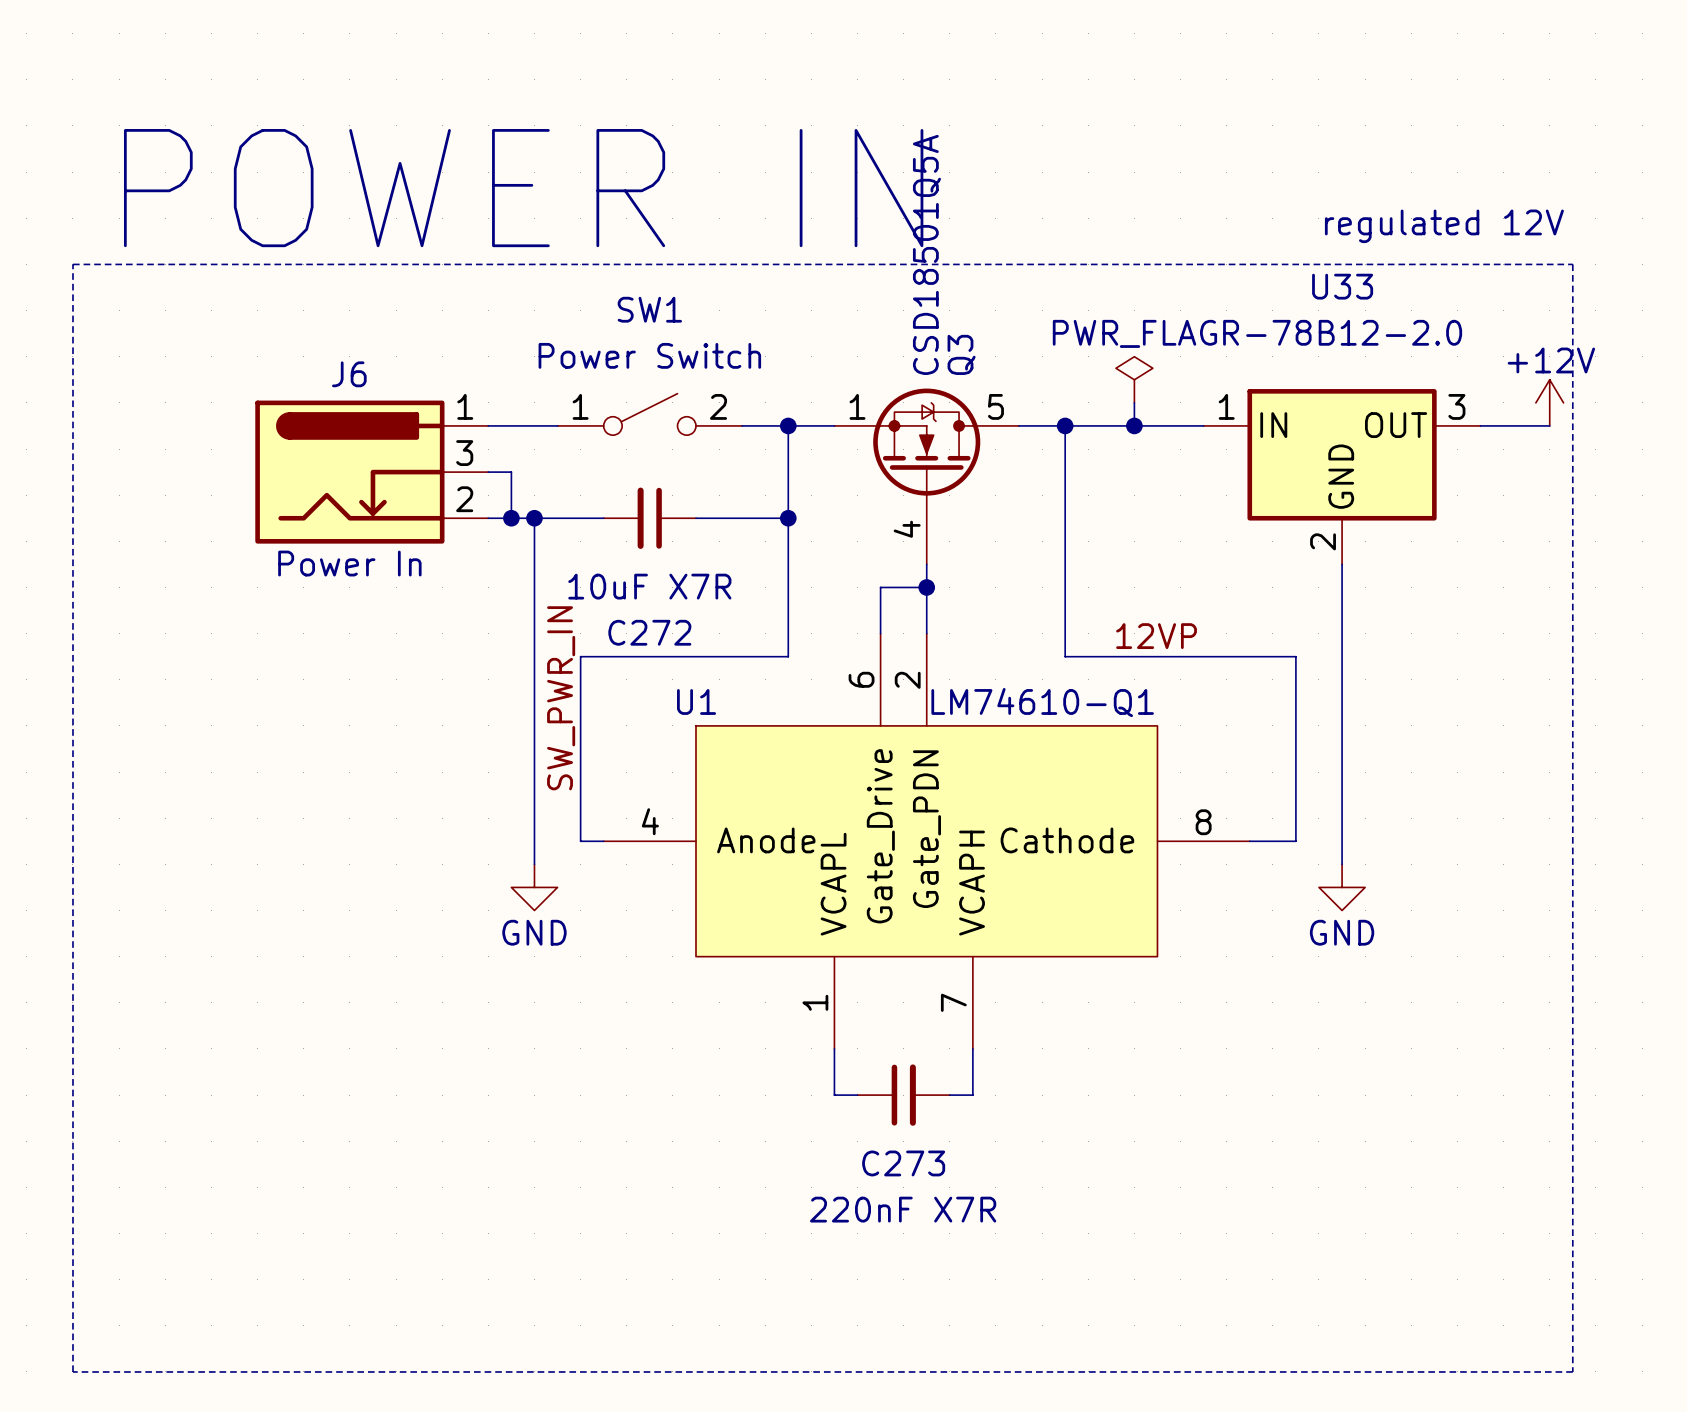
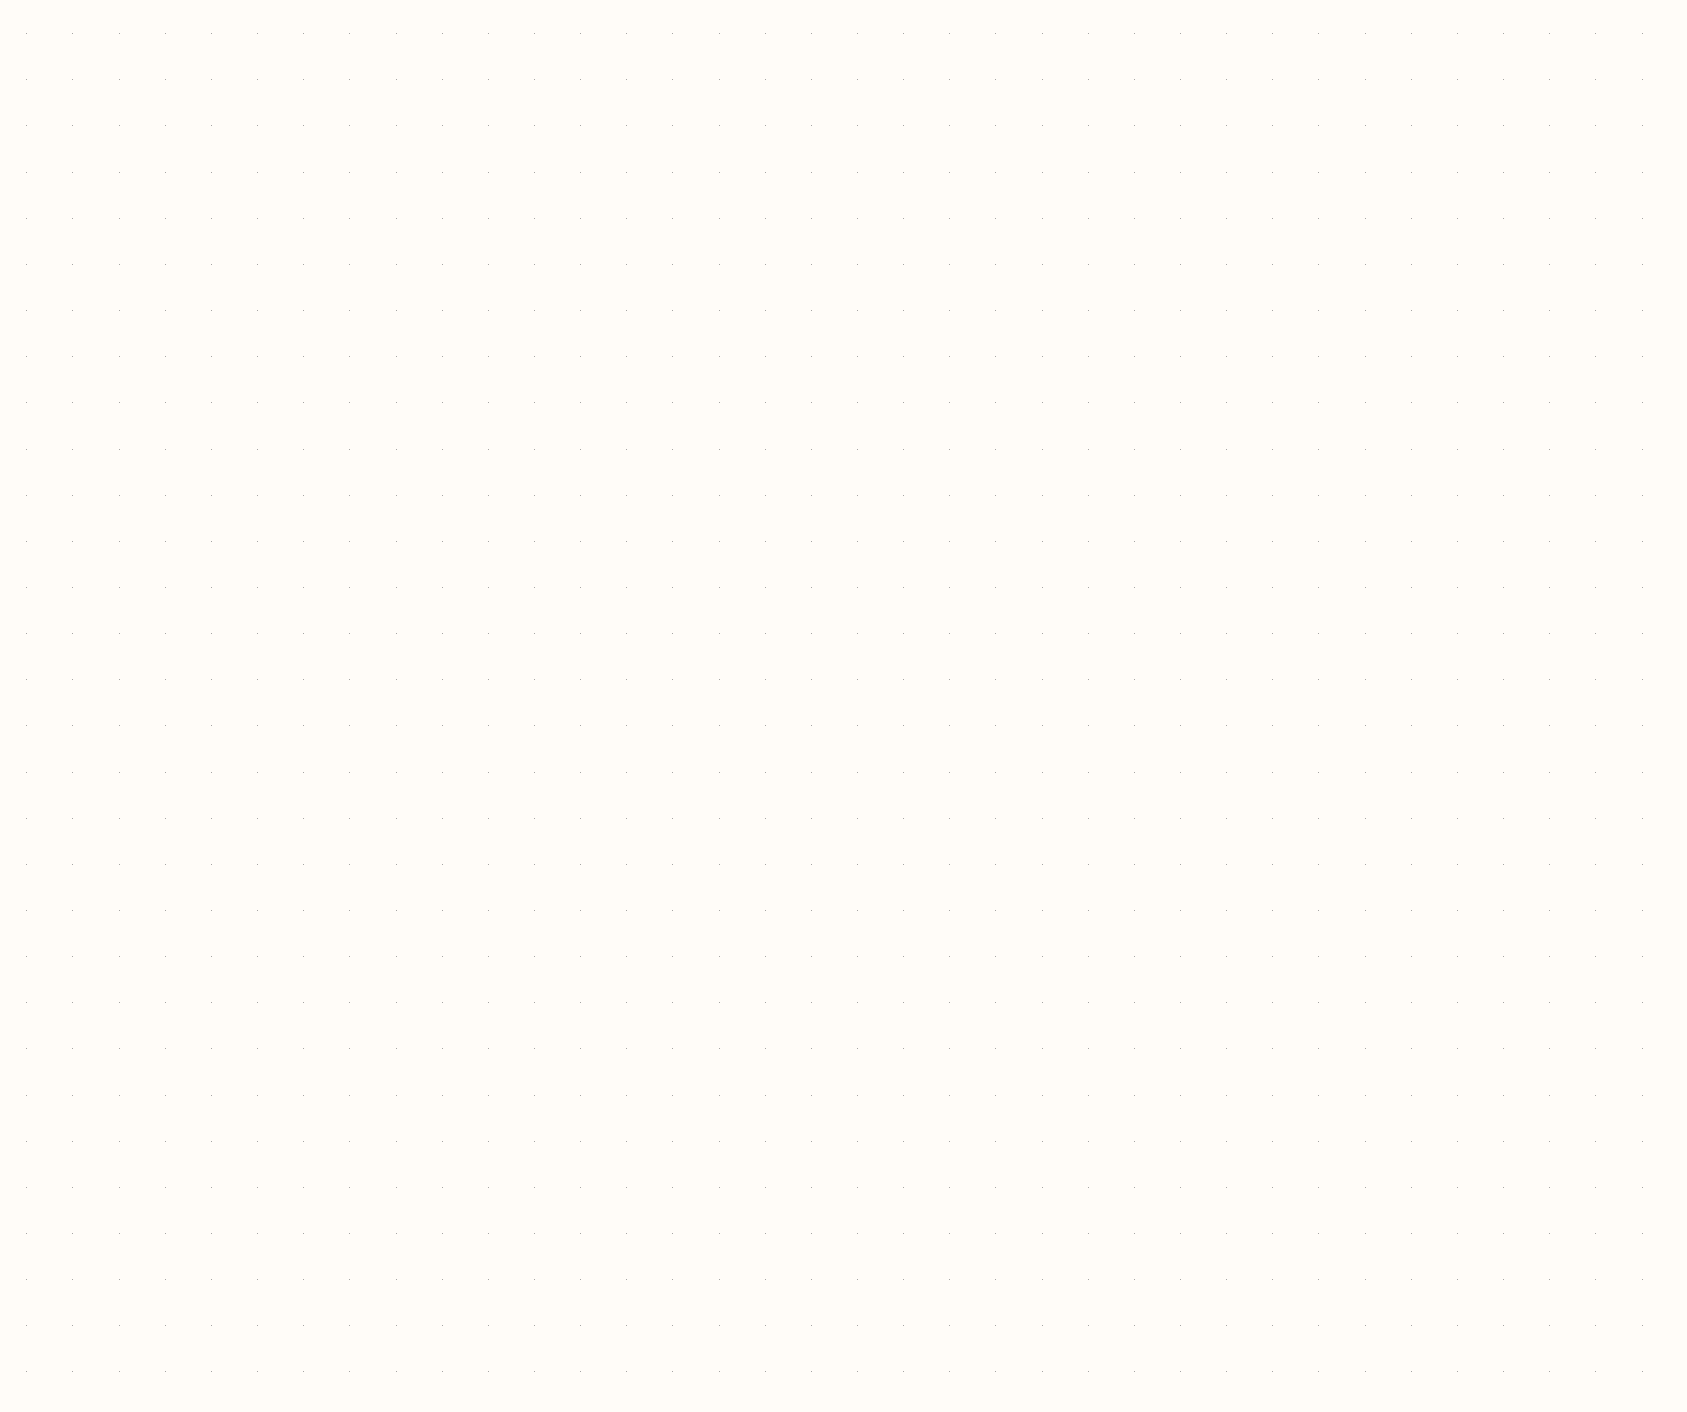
text: POWER IN (523, 188) -> none
text: regulated 12V (1444, 226) -> none
line: (72, 264) (1572, 264) (1572, 1371) (72, 1371) (72, 264) -> none
power symbol: PWR_FLAG (1134, 379) -> none
wire: (1134, 402) (1134, 425) -> none
power symbol: +12V (1549, 402) -> none
SW1: Power Switch (649, 414) -> none
wire: (488, 425) (557, 425) -> none
wire: (742, 425) (834, 425) -> none
wire: (788, 425) (788, 656) (580, 656) (580, 841) (603, 841) -> none
junction: (788, 425) -> none
wire: (1019, 425) (1203, 425) -> none
wire: (1065, 425) (1065, 656) (1295, 656) (1295, 841) (1249, 841) -> none
junction: (1065, 425) -> none
junction: (1134, 425) -> none
wire: (1480, 425) (1549, 425) -> none
J6: Power In (371, 472) -> none
wire: (488, 472) (511, 472) (511, 518) -> none
Q3: CSD18501Q5A (926, 476) -> none
U33: R-78B12-2.0 (1342, 476) -> none
wire: (488, 518) (603, 518) -> none
junction: (511, 518) -> none
wire: (534, 518) (534, 864) -> none
junction: (534, 518) -> none
C272: 10uF X7R (649, 518) -> none
wire: (695, 518) (788, 518) -> none
junction: (788, 518) -> none
wire: (926, 564) (926, 633) -> none
wire: (1342, 564) (1342, 864) -> none
wire: (926, 587) (880, 587) (880, 633) -> none
junction: (926, 587) -> none
label: 12VP (1156, 636) -> none
label: SW_PWR_IN (561, 698) -> none
U1: LM74610-Q1 (926, 841) -> none
power symbol: GND (534, 887) -> none
power symbol: GND (1342, 887) -> none
wire: (834, 1048) (834, 1095) (857, 1095) -> none
wire: (972, 1048) (972, 1095) (949, 1095) -> none
C273: 220nF X7R (903, 1095) -> none

